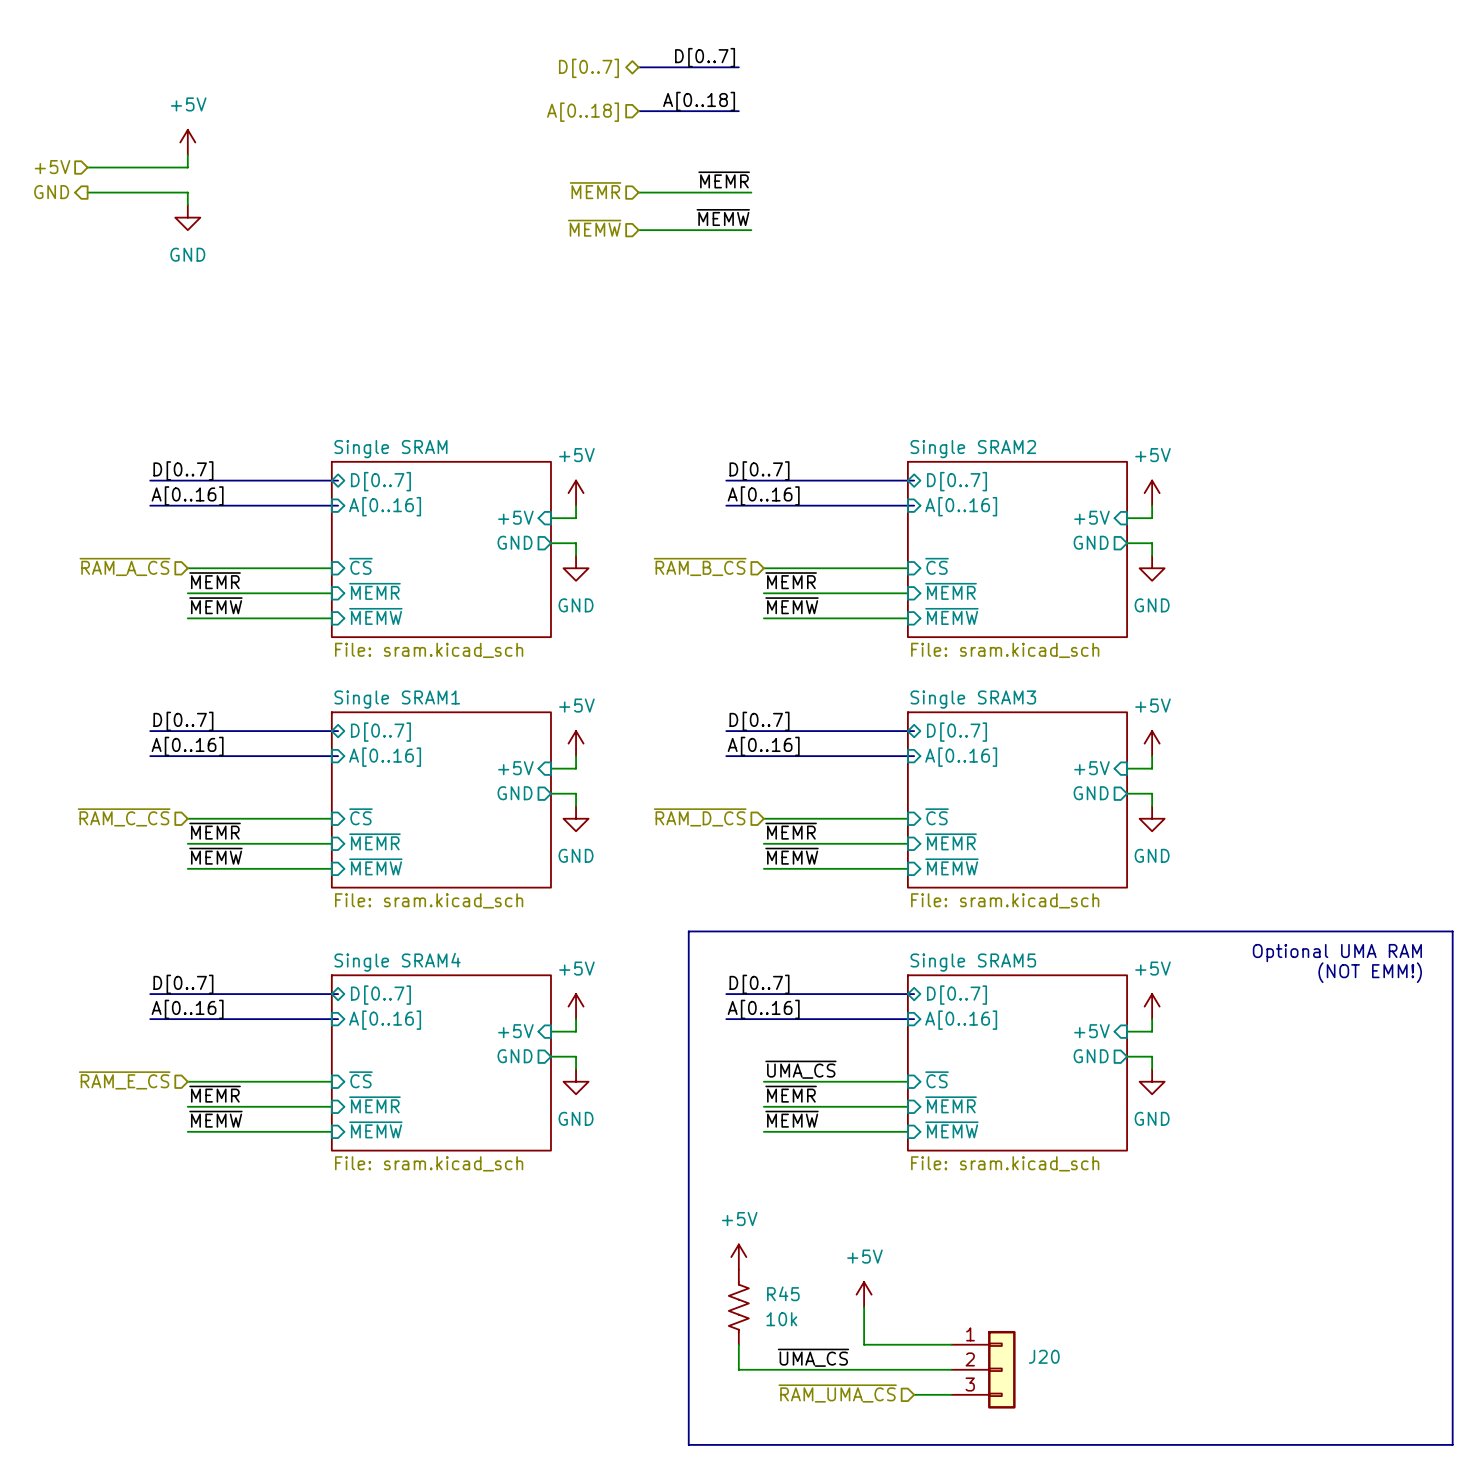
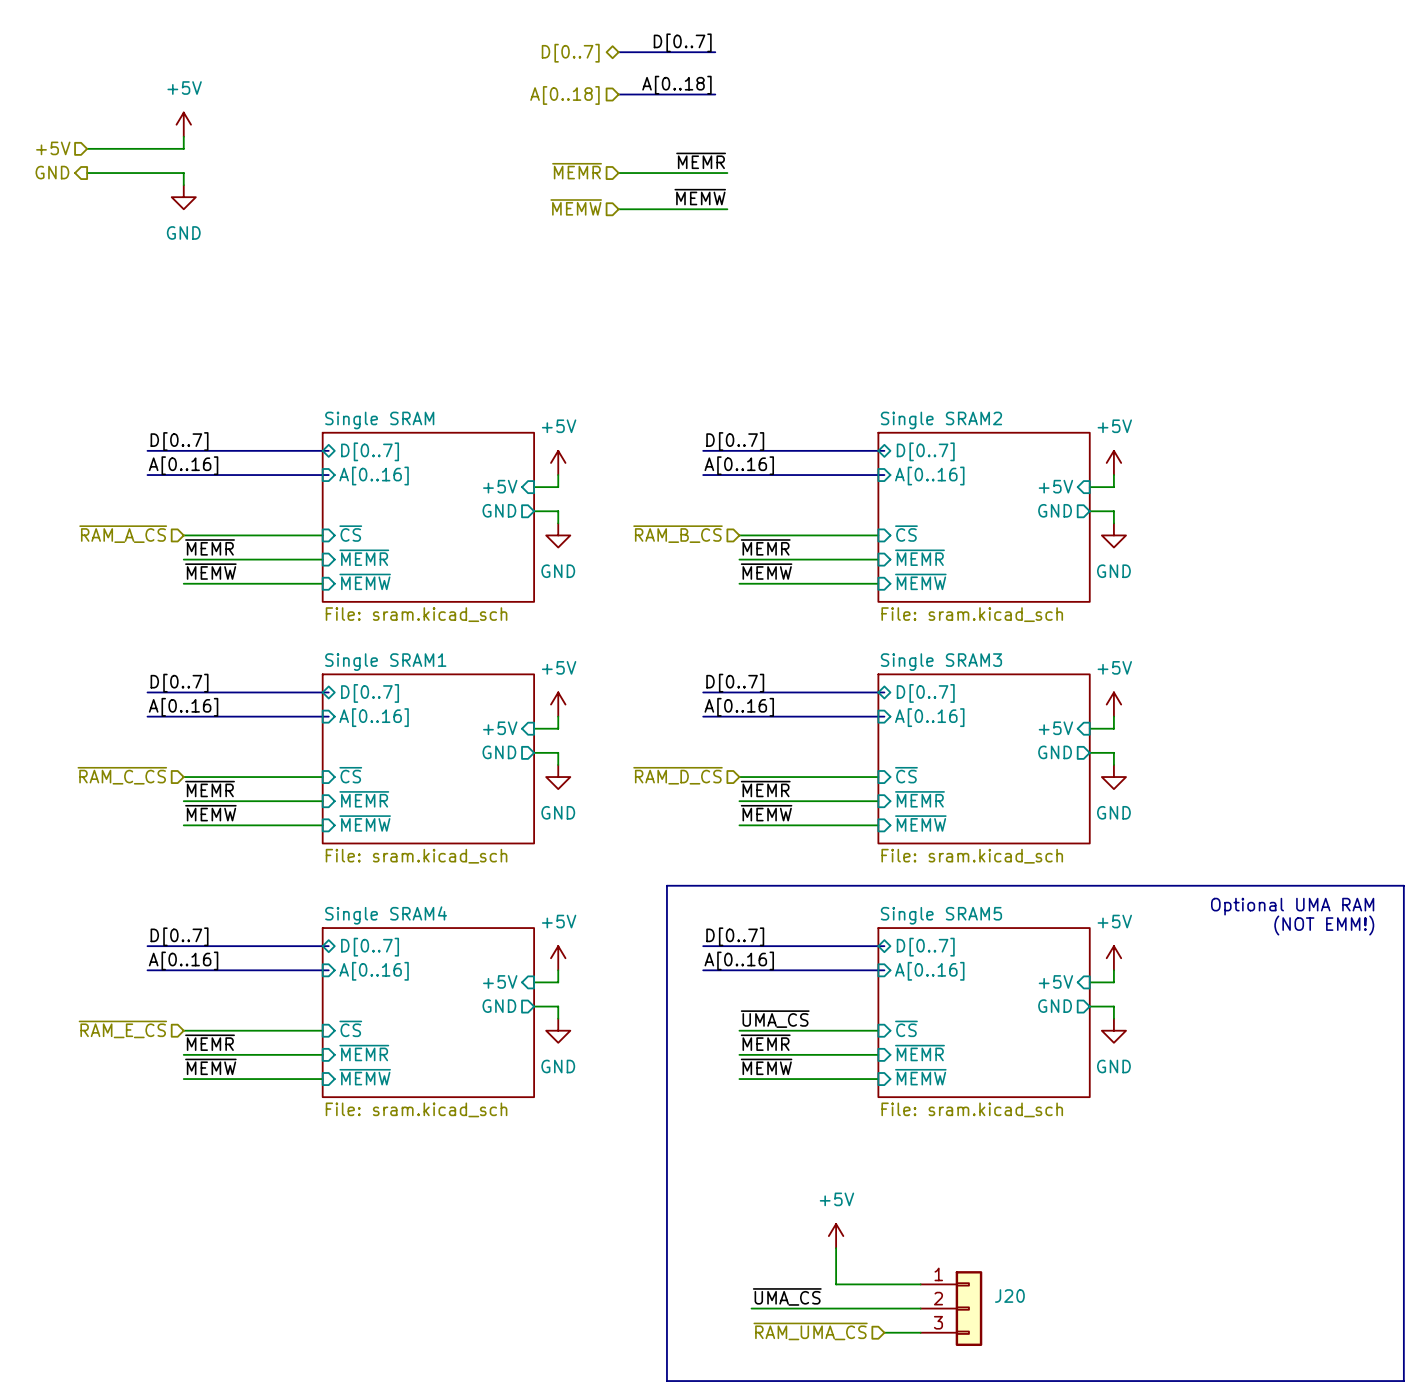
power symbol: +5V (738, 1257) -> none
R45: 10k (738, 1307) -> none
wire: (738, 1344) (738, 1369) (776, 1369) -> none

